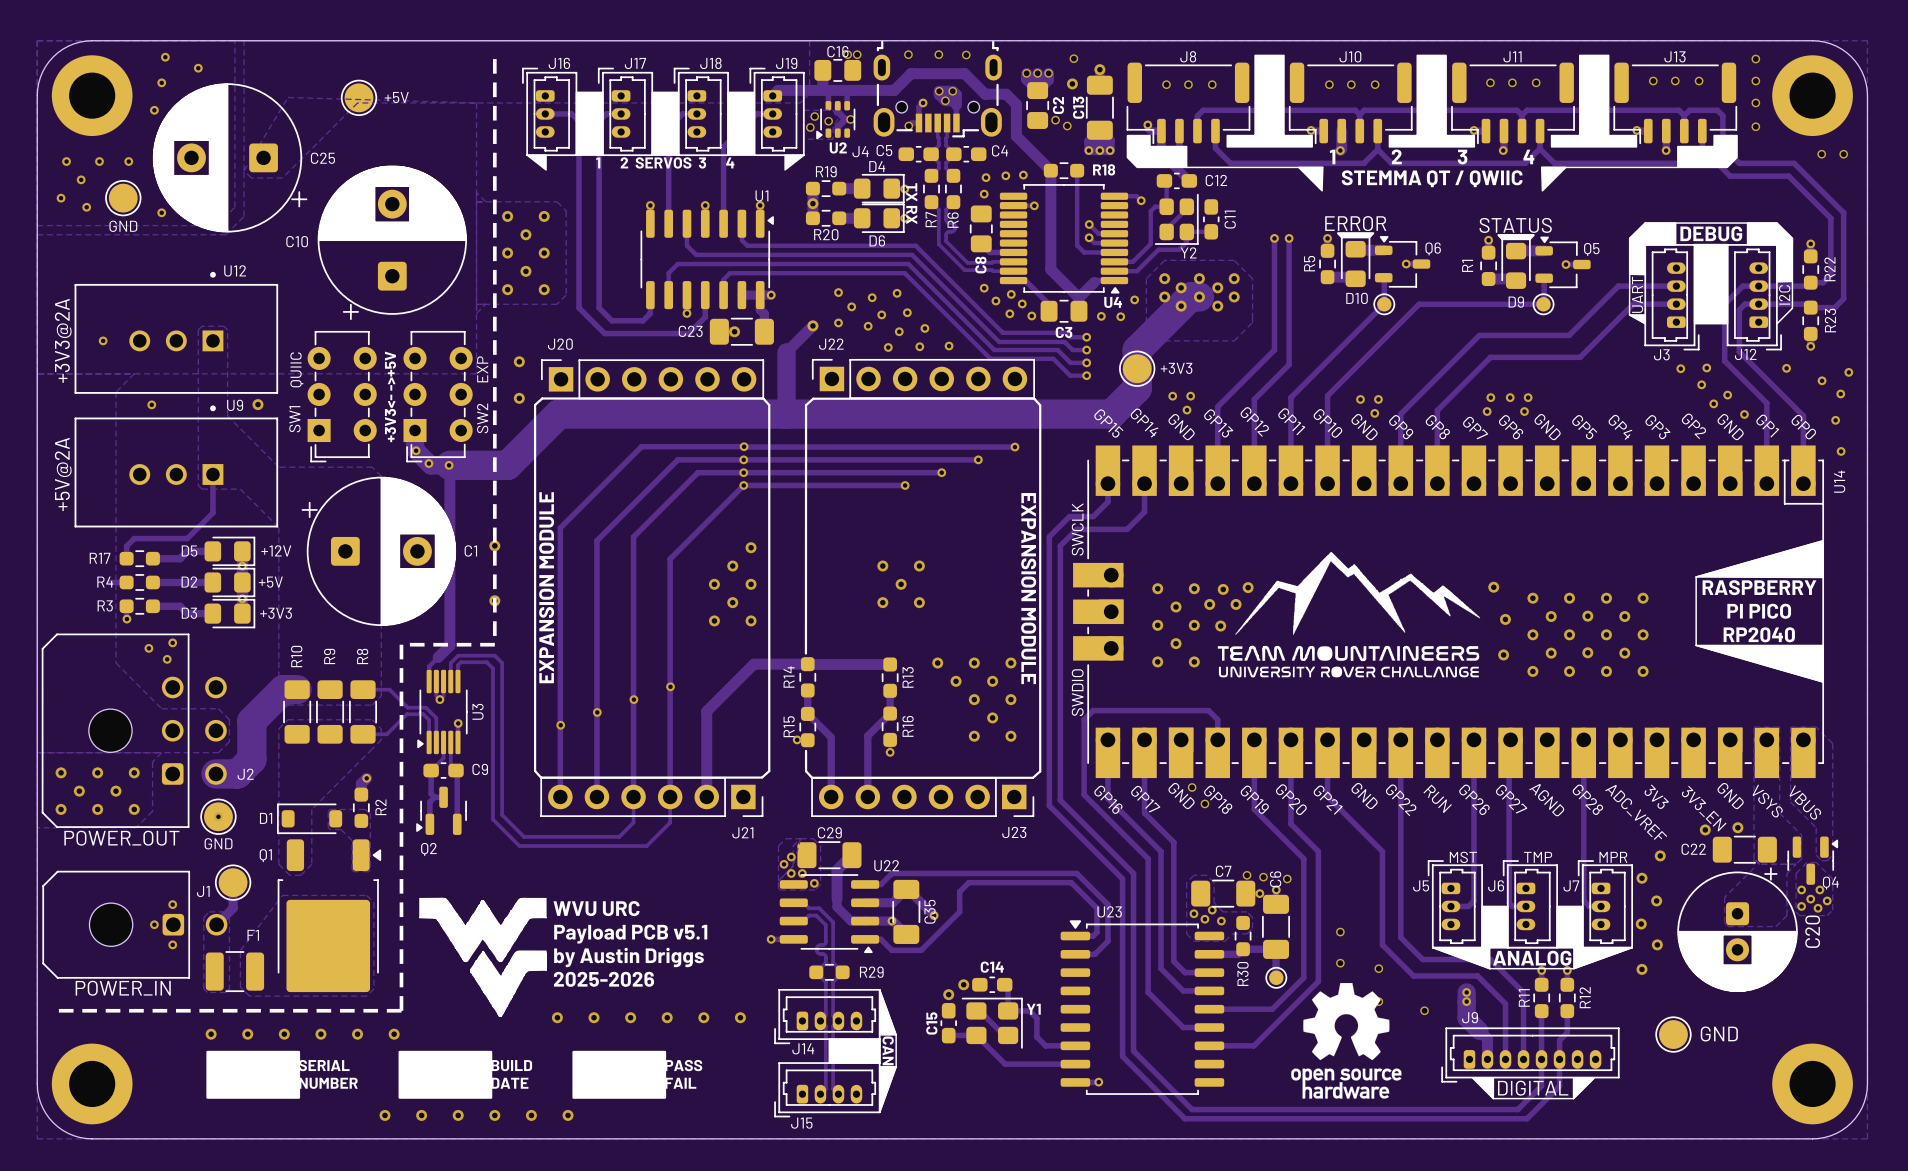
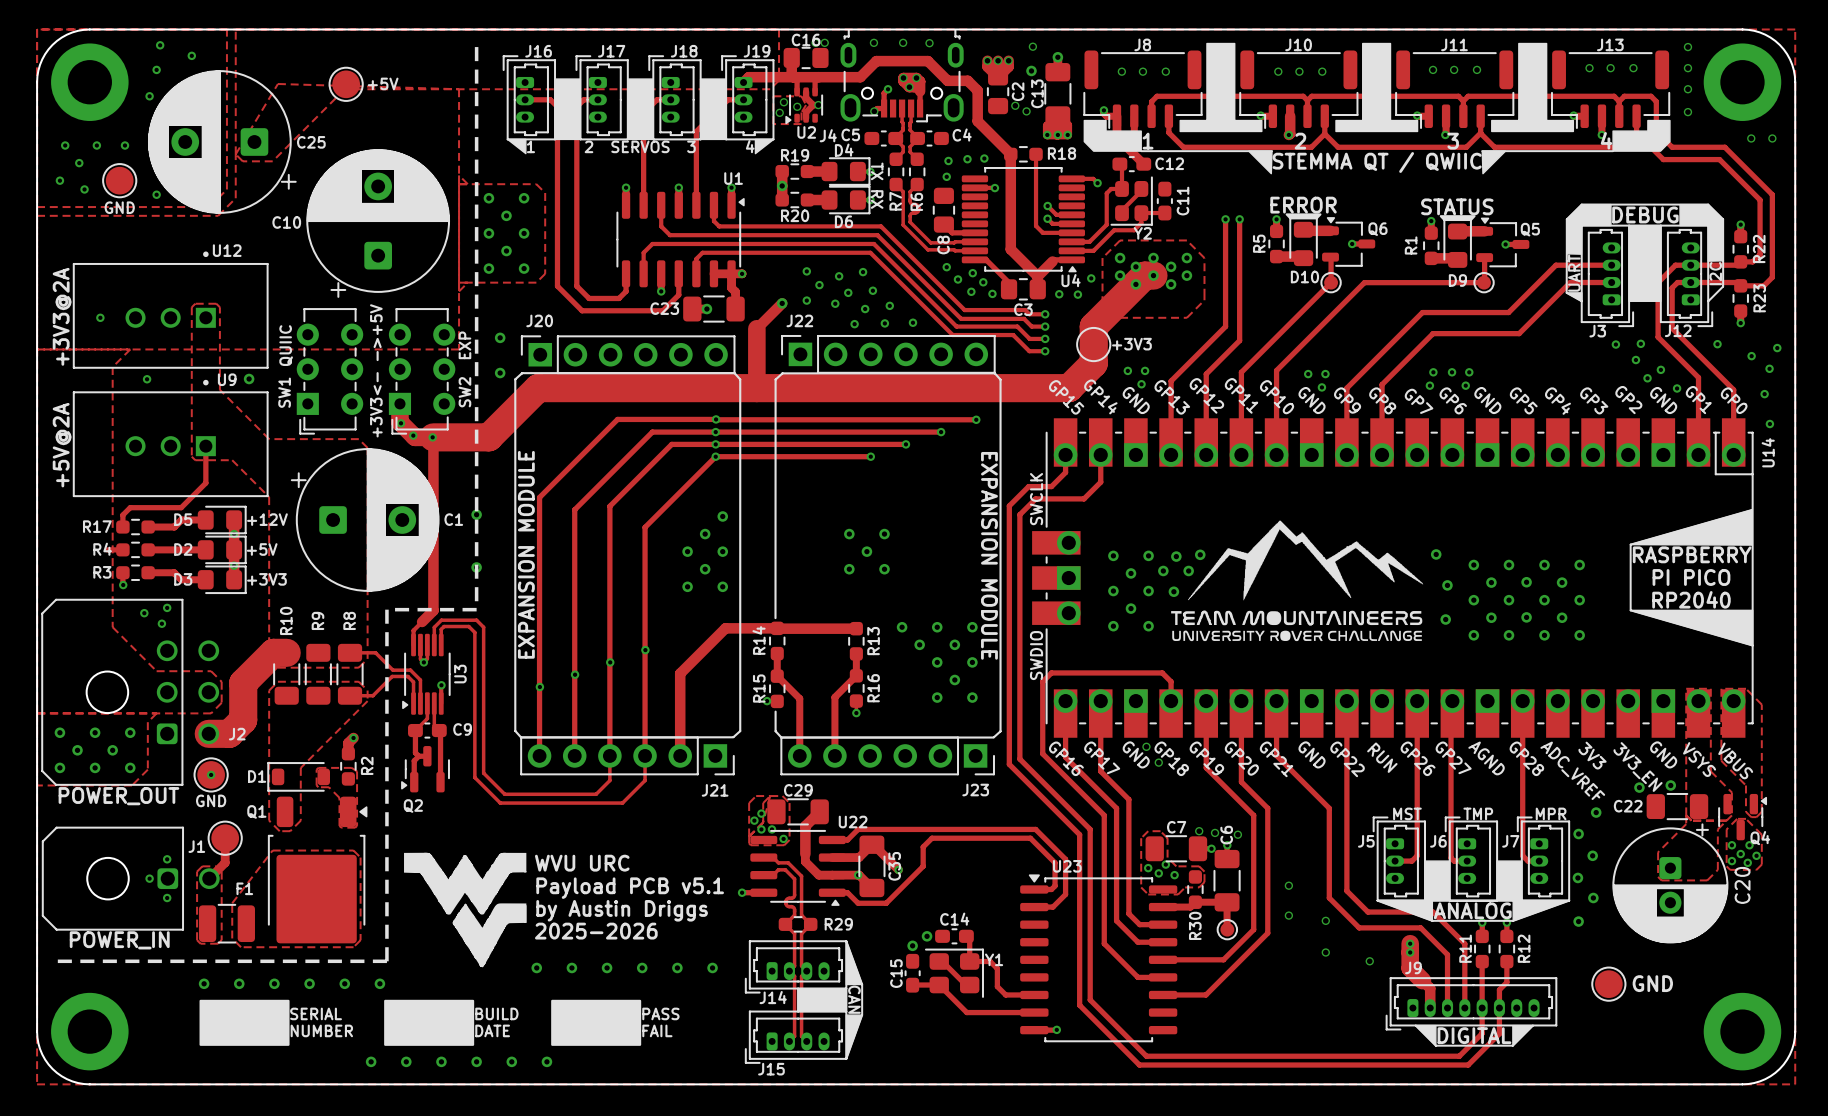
drawing: [1291, 983, 1402, 1099] -> none

